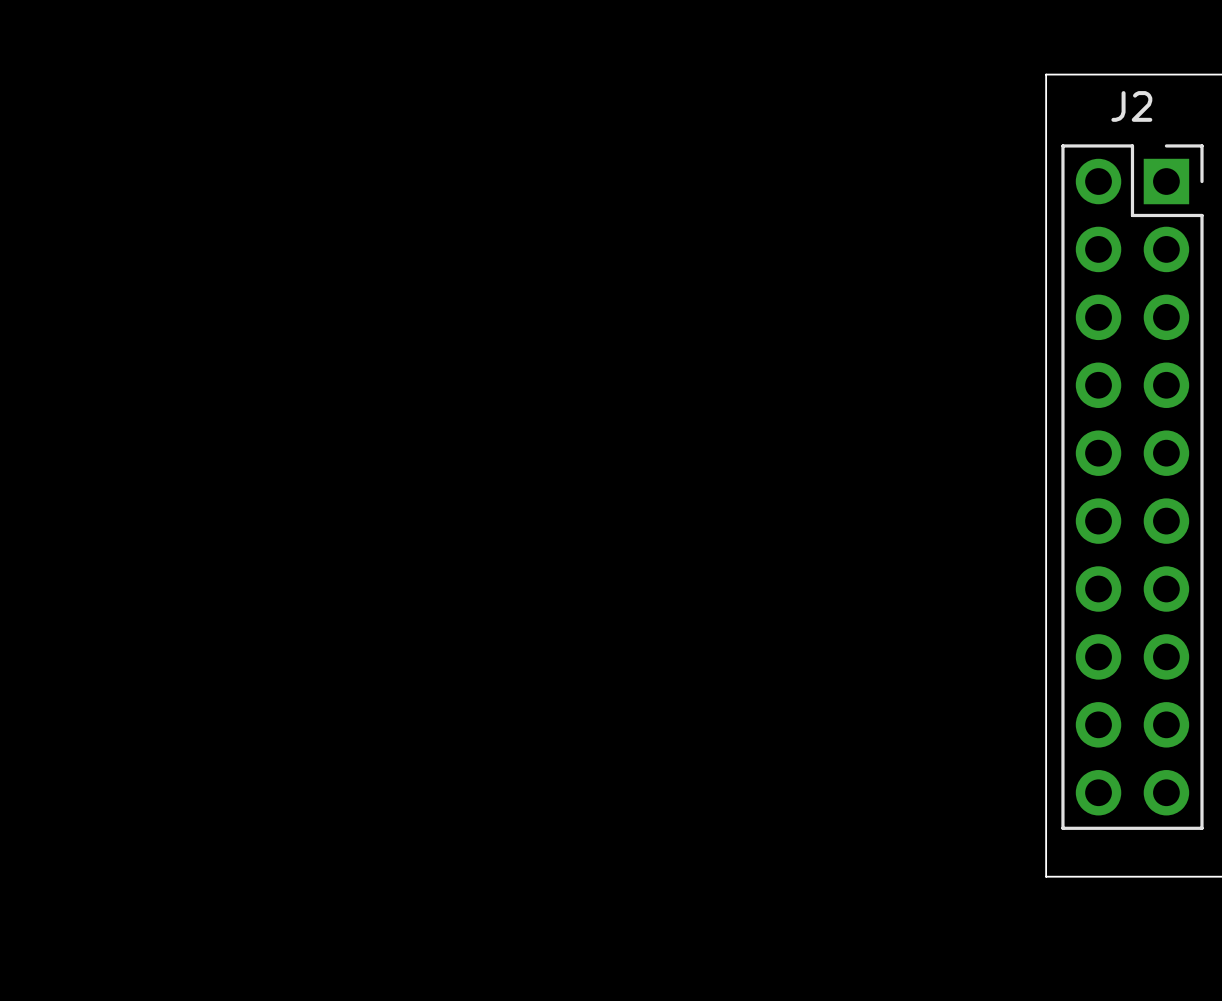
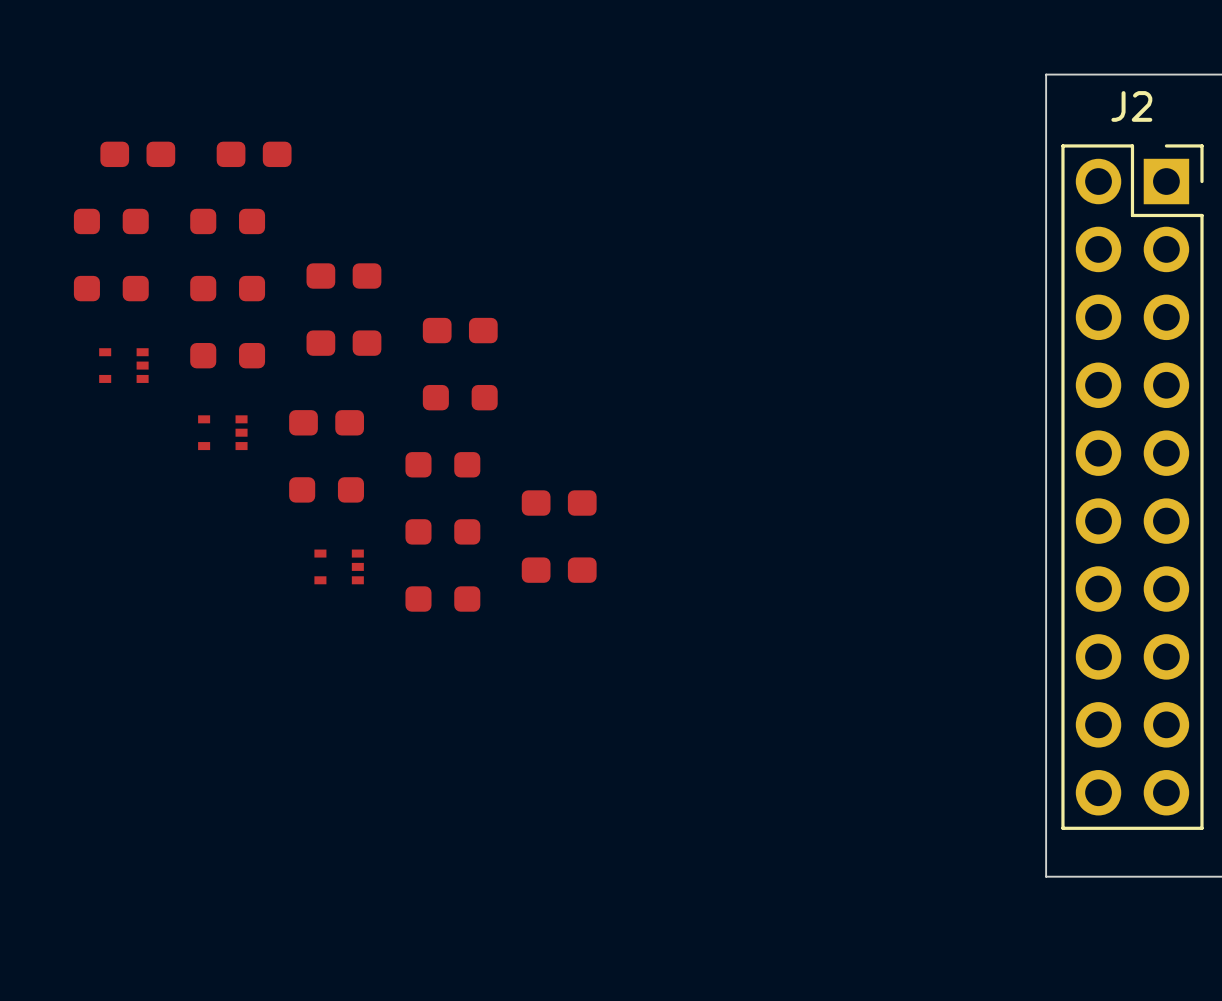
part: none -> (137, 154)
part: none -> (254, 154)
part: none -> (111, 221)
part: none -> (227, 221)
part: none -> (343, 276)
part: none -> (111, 288)
part: none -> (227, 288)
part: none -> (460, 330)
part: none -> (343, 343)
part: none -> (227, 355)
part: none -> (123, 365)
part: none -> (460, 397)
part: none -> (326, 422)
part: none -> (222, 432)
part: none -> (442, 464)
part: none -> (326, 489)
part: none -> (559, 503)
part: none -> (442, 531)
part: none -> (339, 566)
part: none -> (559, 570)
part: none -> (442, 599)

